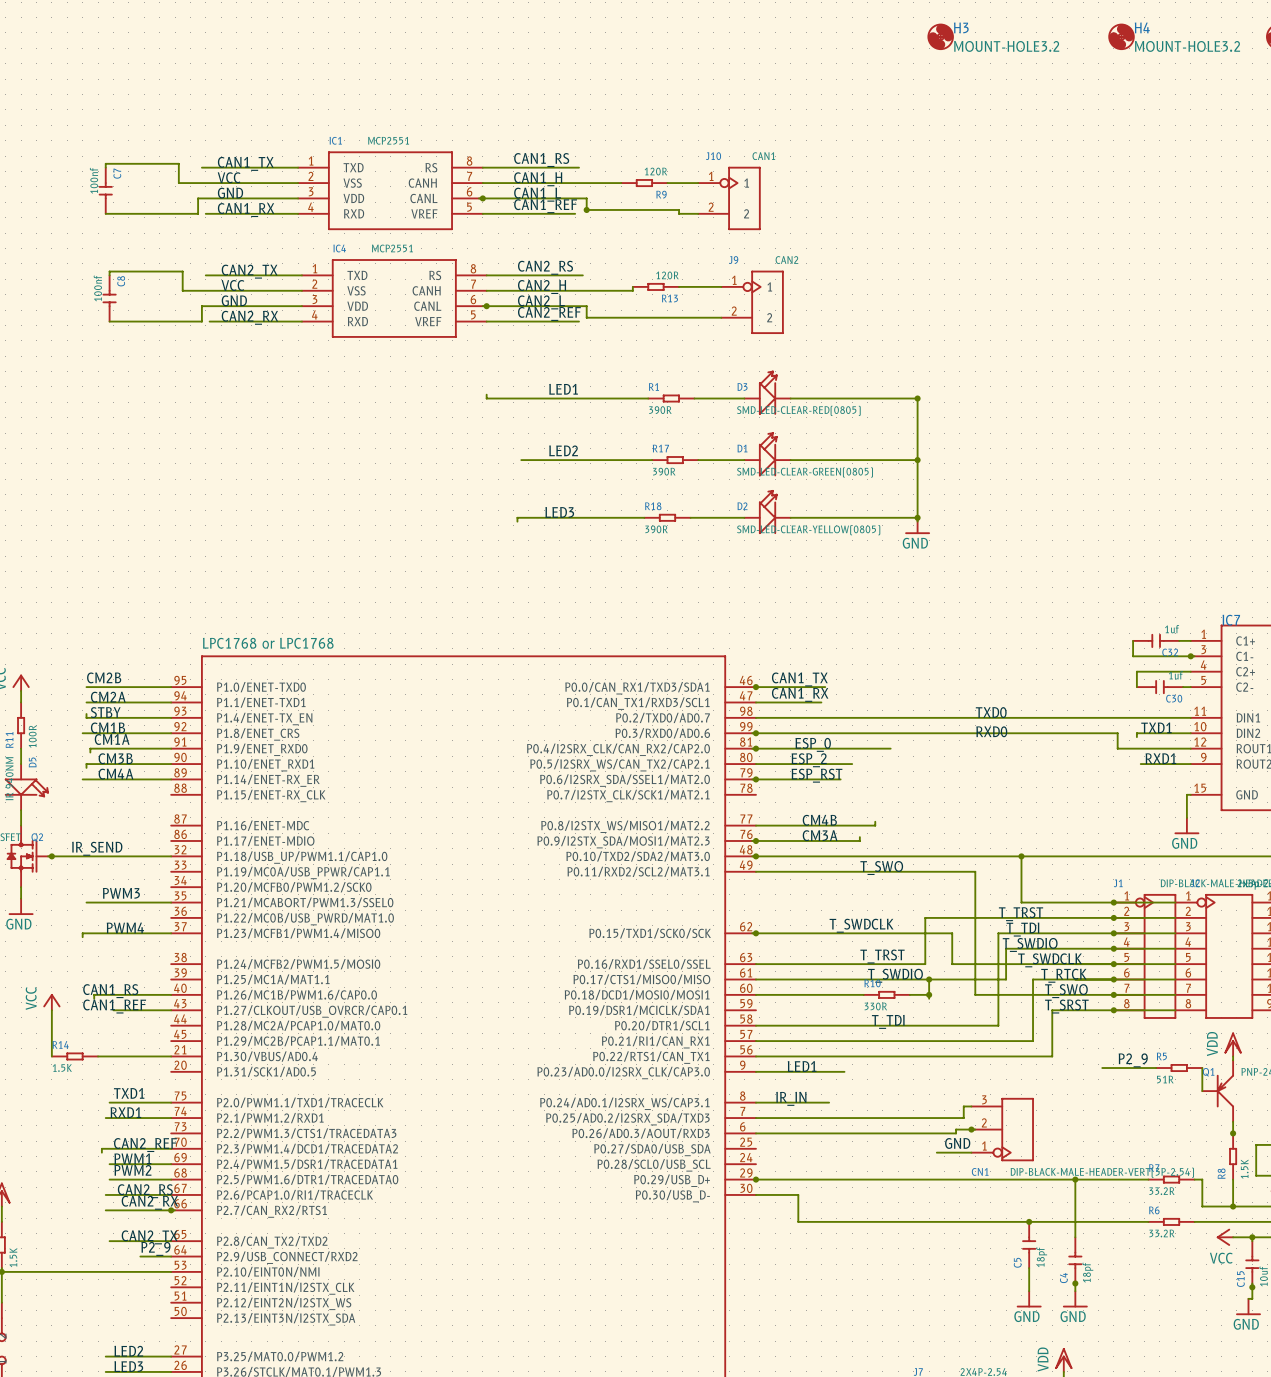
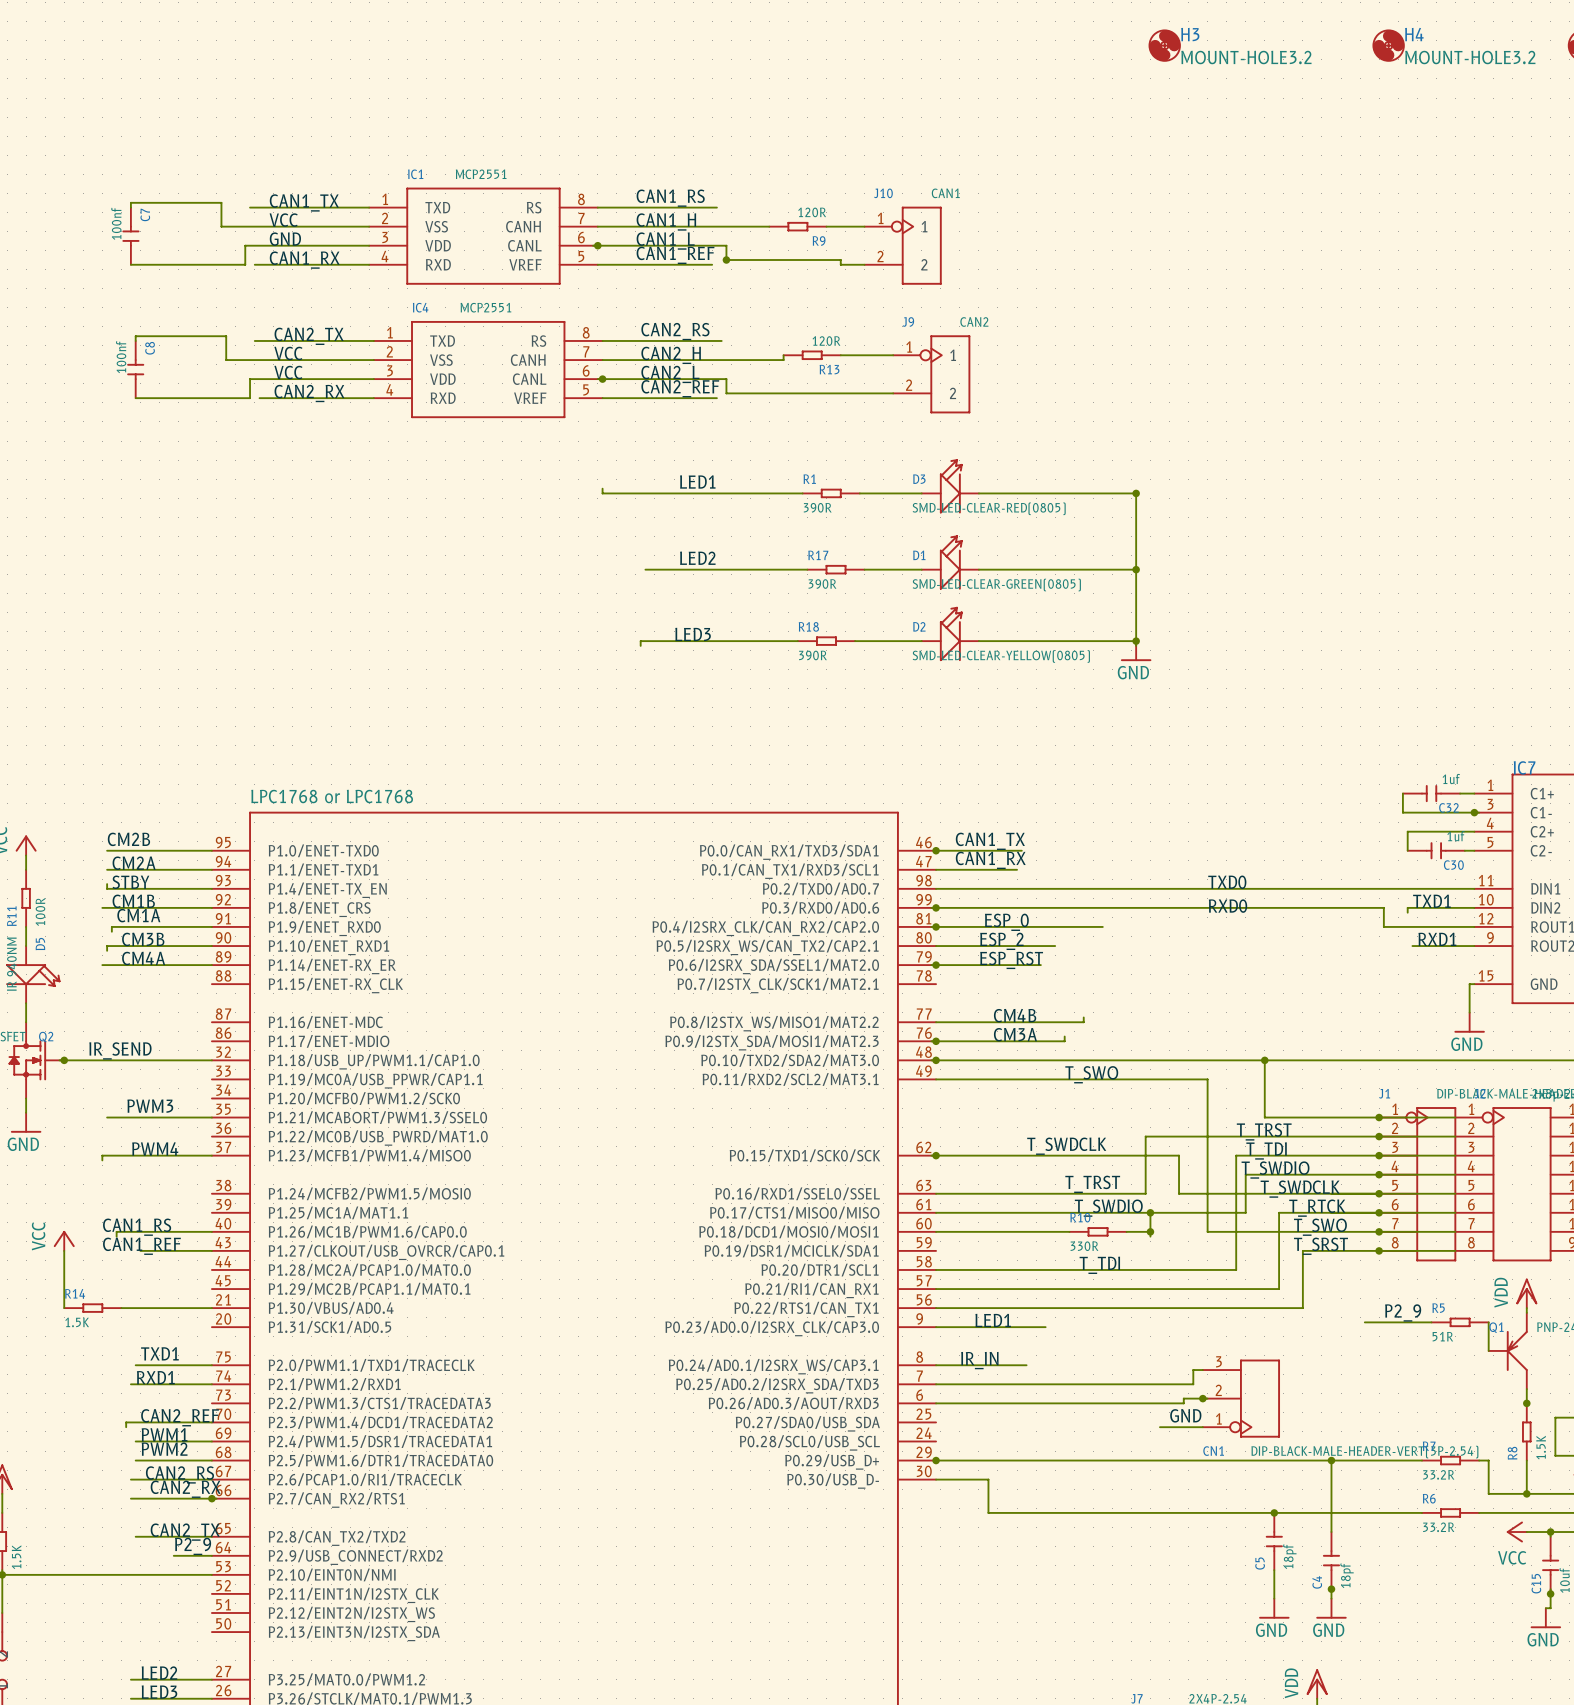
label: GND (234, 300) -> VCC (288, 372)

